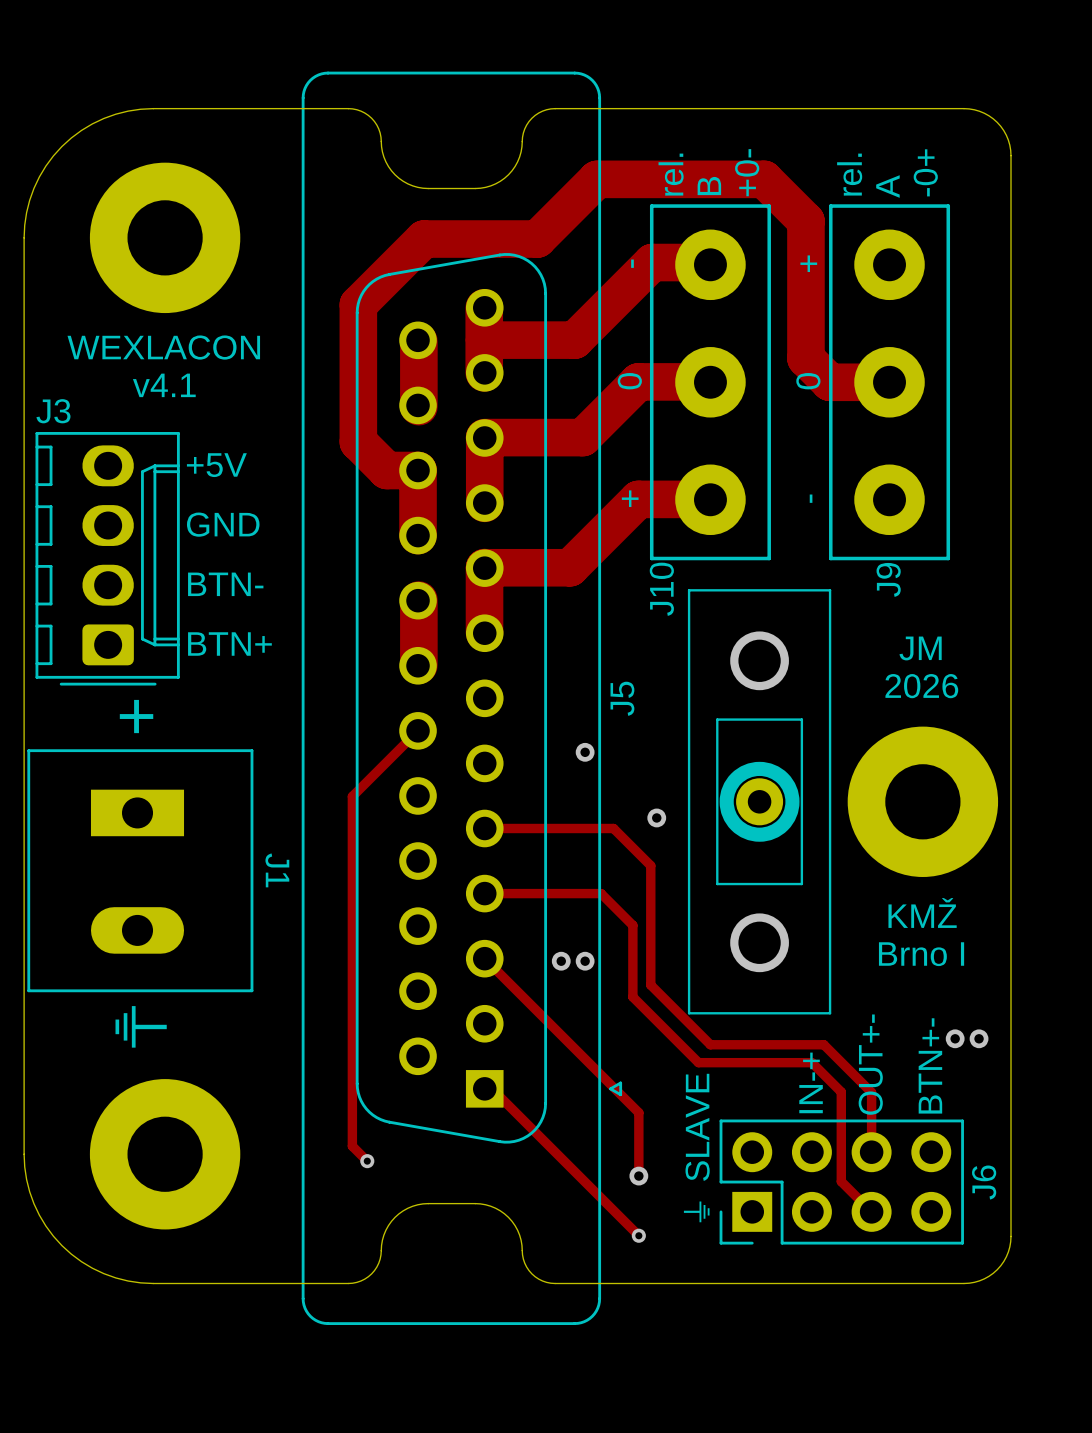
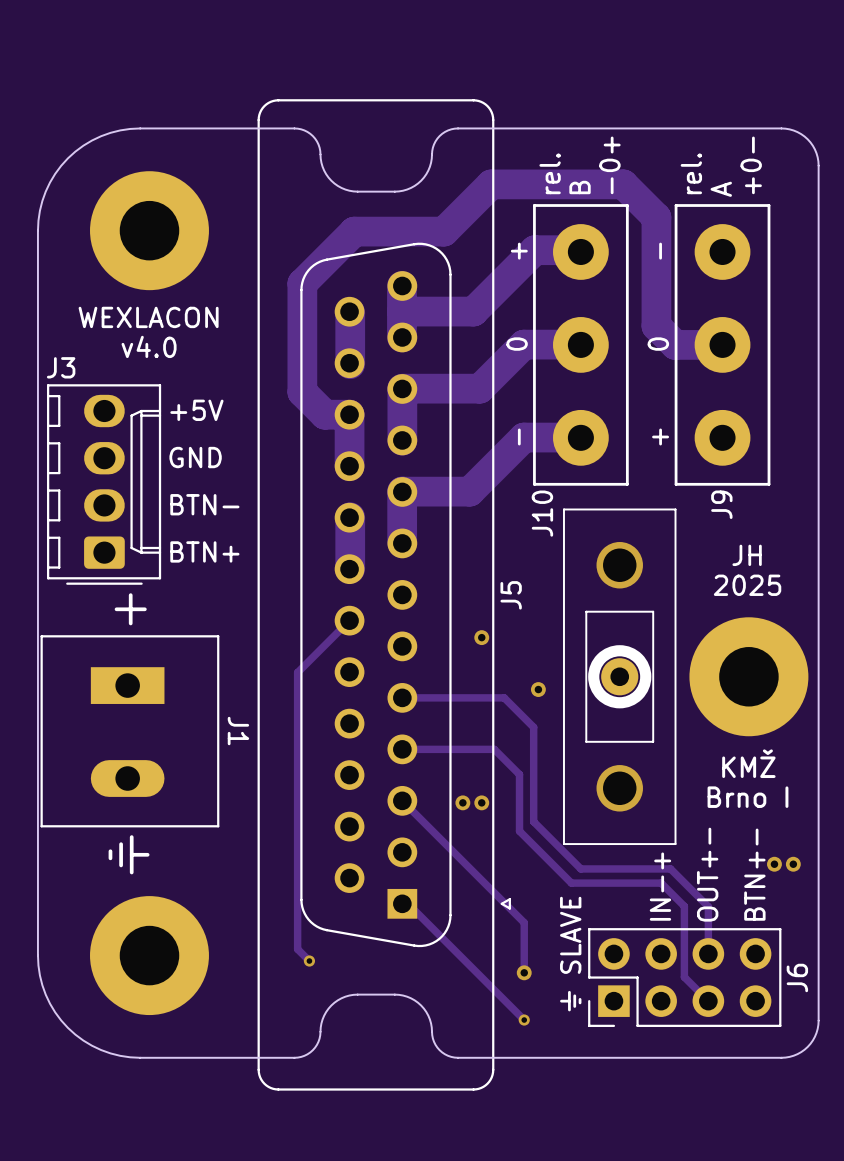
text: +0- (747, 172) -> -0+ (609, 165)
text: -0+ (925, 172) -> +0- (751, 165)
text: - (632, 263) -> + (519, 251)
text: + (808, 263) -> - (660, 251)
text: v4.1 (164, 385) -> v4.0 (149, 346)
text: + (630, 498) -> - (519, 436)
text: - (811, 498) -> + (660, 436)
text: JM (920, 648) -> JH (747, 555)
text: 2026 (921, 686) -> 2025 (747, 585)

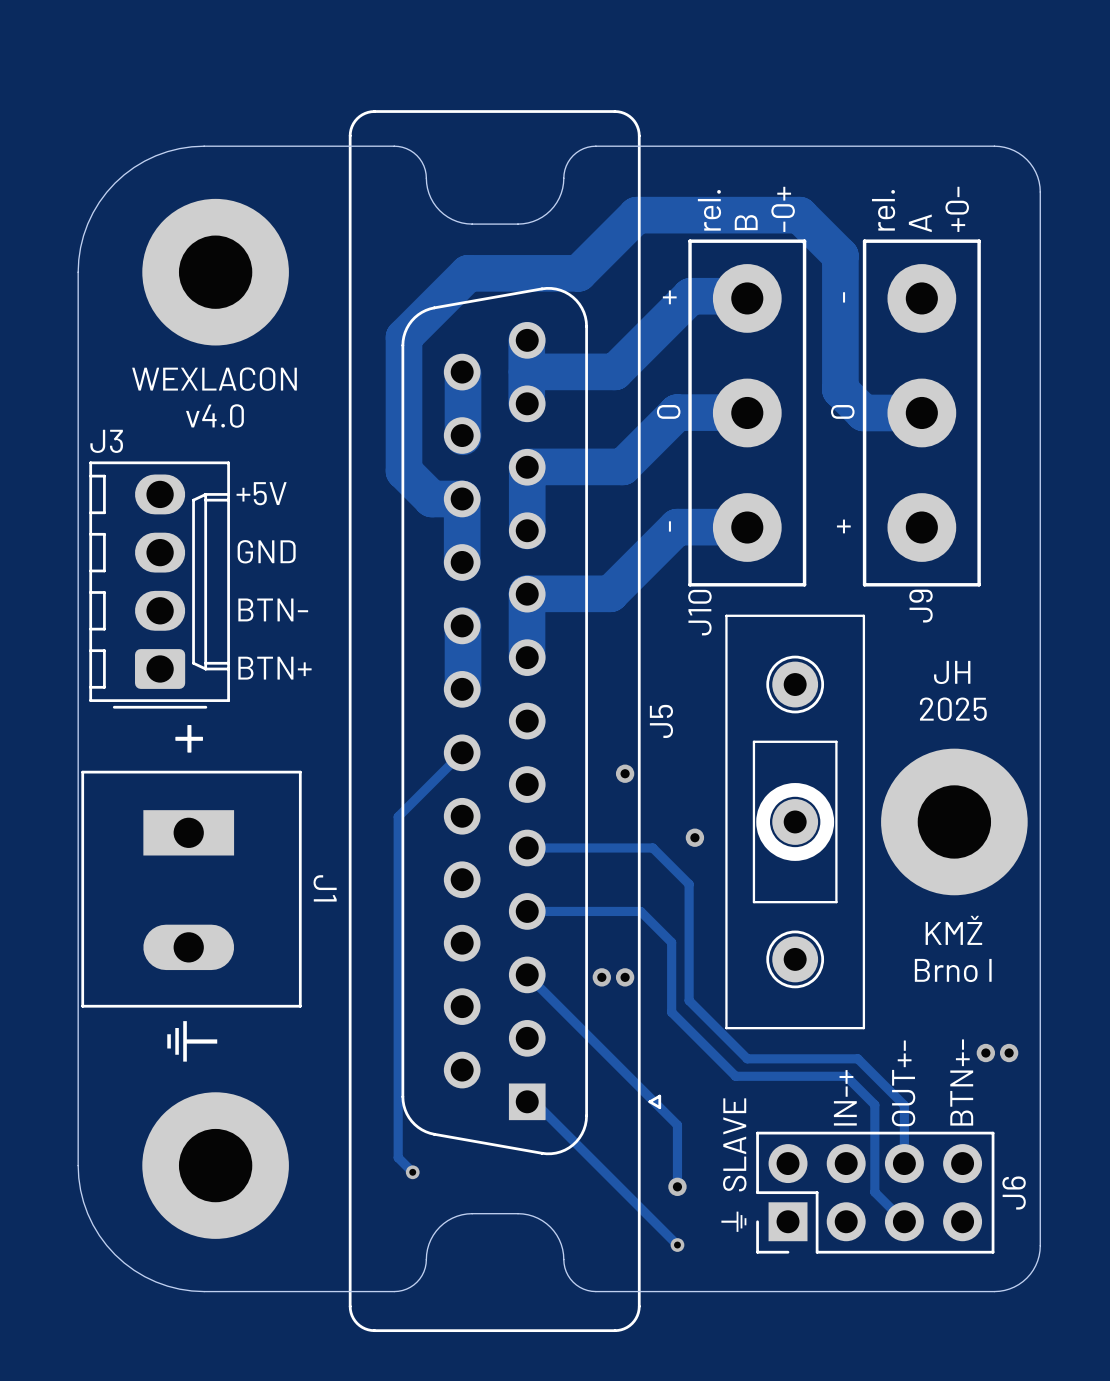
via: (619, 565) -> none
part: none -> (795, 684)
via: (619, 788) -> none
part: none -> (795, 959)

